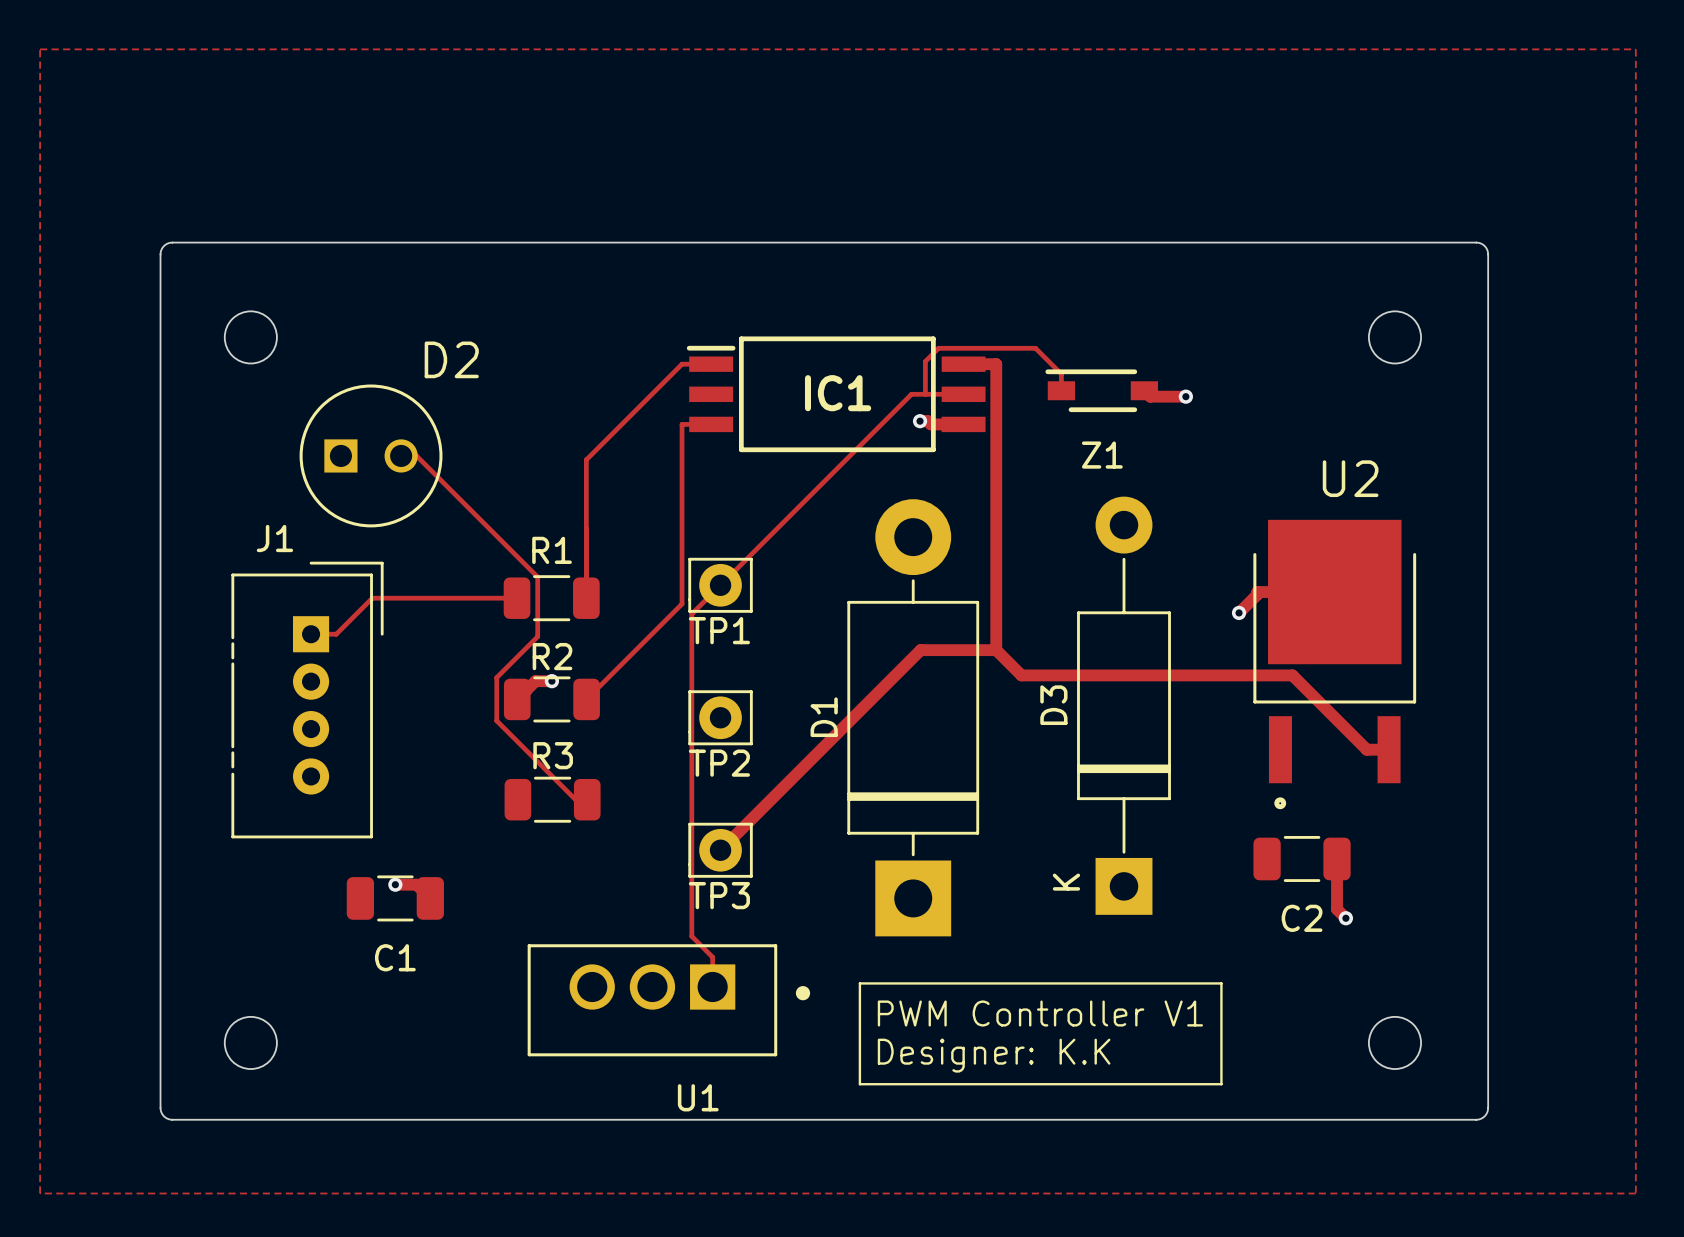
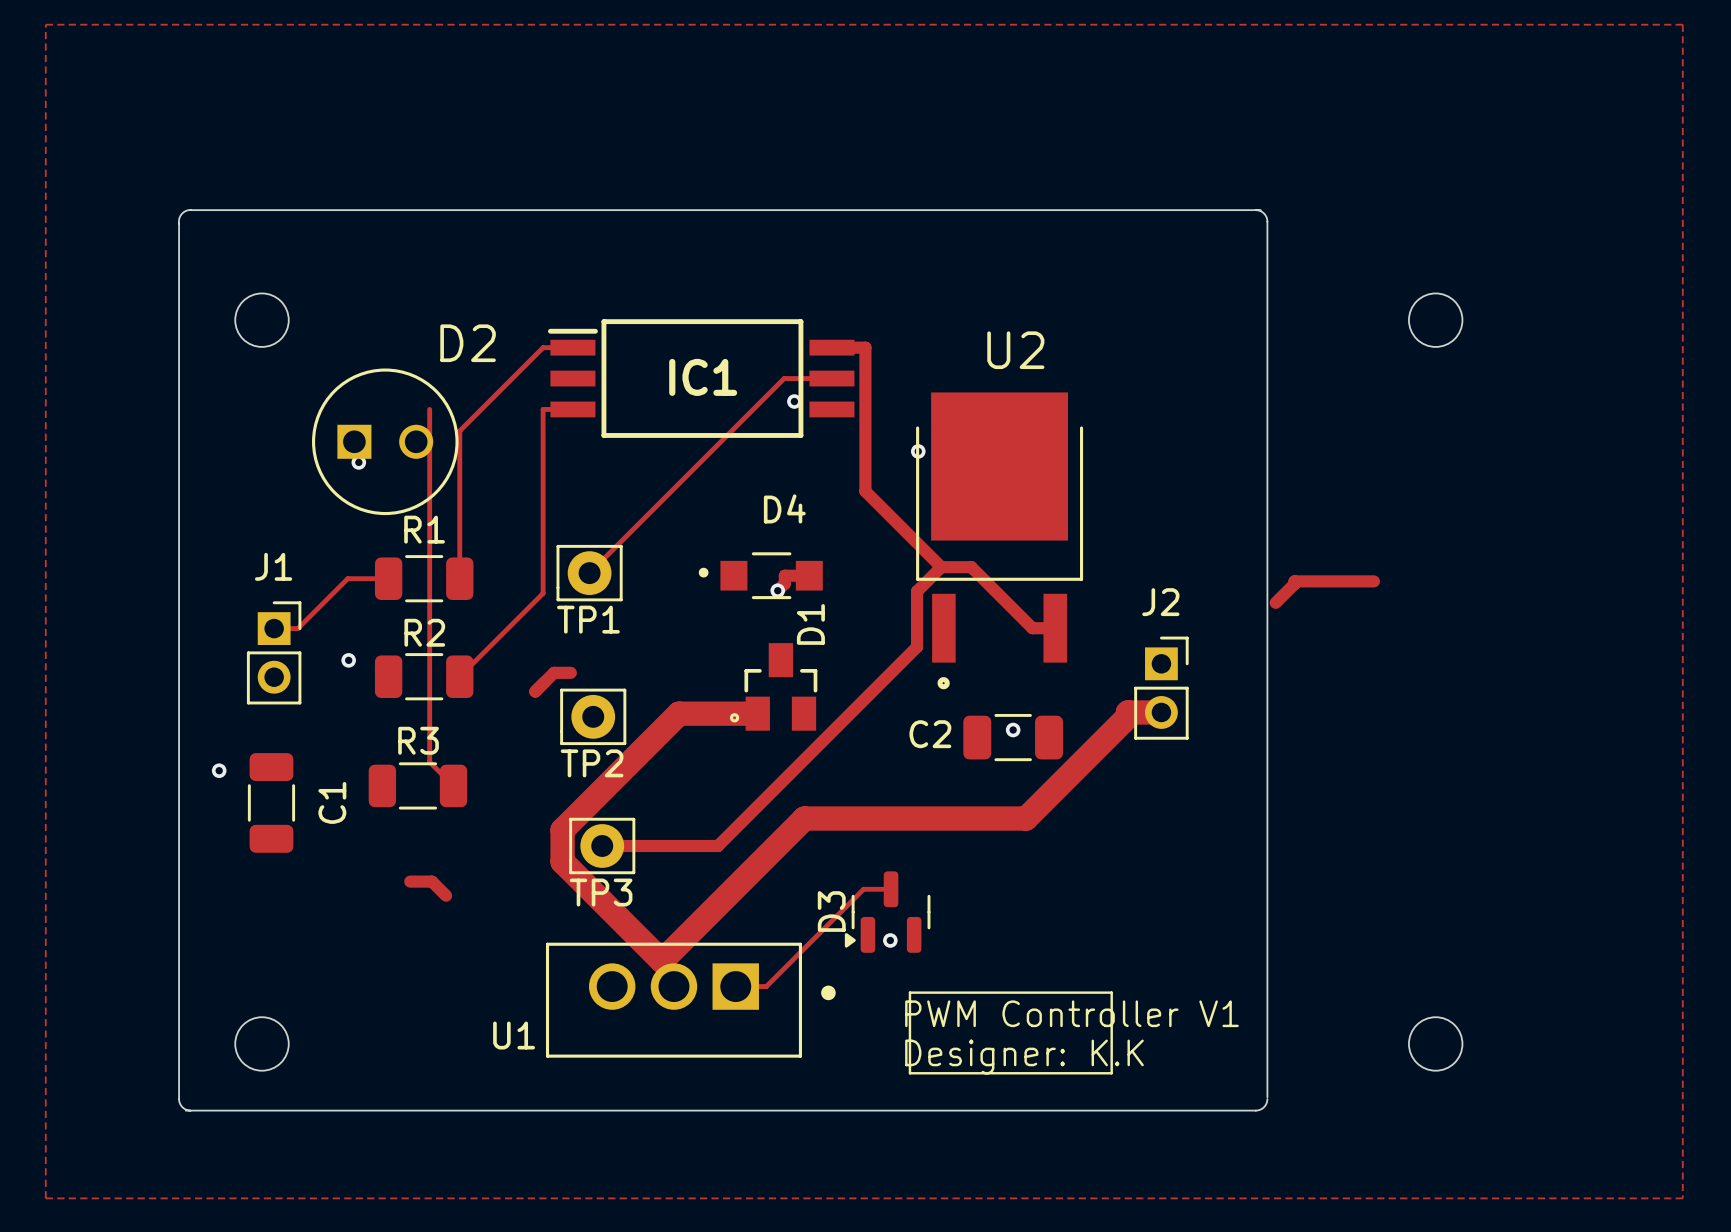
board edge: none -> (1255, 210) (1264, 213) (1267, 221) (1267, 1097)
board edge: none -> (1260, 210) (189, 210) (182, 213) (178, 222) (179, 1099) (182, 1107) (190, 1110)
board edge: (172, 242) (1476, 242) (1482, 244) (1486, 248) (1488, 254) (1488, 1107) (1486, 1113) (1482, 1118) (1476, 1119) (172, 1119) (166, 1118) (162, 1113) (160, 1107) (160, 254) (163, 246) (172, 242) -> none
track: none -> (572, 347) (543, 347) (459, 430) (459, 578)
track: (711, 364) (682, 364) (586, 459) (586, 598) -> none
track: none -> (831, 347) (865, 347) (865, 491) (941, 567)
track: (963, 364) (996, 364) (996, 650) -> none
track: (1061, 390) (1061, 374) (1035, 348) (938, 348) (925, 361) (925, 394) -> none
Z1: (1101, 390) -> none
track: (1144, 390) (1150, 396) (1185, 396) -> none
track: none -> (831, 378) (784, 378) (589, 573)
IC1 position: (836, 394) -> (701, 378)
track: (963, 394) (911, 394) (691, 614) (691, 936) (712, 957) (712, 987) -> (891, 889) (863, 889) (766, 986) (735, 986)
via: (1185, 396) -> none
via: none -> (794, 401)
via position: (920, 421) -> (918, 451)
track: none -> (429, 409) (429, 762) (453, 785)
track: none -> (572, 409) (543, 409) (543, 593) (459, 676)
track: (711, 424) (682, 424) (682, 603) (586, 699) -> none
track: (401, 455) (416, 455) (537, 577) (537, 636) (496, 677) (496, 720) (575, 799) (587, 799) -> none
via: none -> (358, 462)
D3 footprint: [1077, 496, 1171, 915] -> [844, 871, 931, 953]
D1 footprint: [847, 499, 980, 937] -> [729, 643, 818, 731]
J1 name position: J1 (274, 538) -> J1 (273, 566)
J1 footprint: [231, 561, 384, 839] -> [246, 601, 302, 705]
track: none -> (941, 567) (971, 567) (1032, 628) (1055, 628)
track: none -> (941, 567) (917, 591) (917, 646) (718, 845) (602, 845)
TP1 position: (720, 585) -> (589, 573)
D4: none -> (760, 575)
track: none -> (809, 575) (784, 575) (784, 583) (777, 590)
track: none -> (388, 578) (347, 578) (297, 628) (274, 628)
track: (517, 598) (372, 598) (336, 634) (311, 634) -> none
R1 position: (551, 598) -> (424, 578)
via: none -> (777, 590)
via: (1239, 612) -> none
track: (996, 650) (1021, 675) (1292, 675) (1366, 749) (1389, 749) -> none
track: (996, 650) (920, 650) (720, 850) -> none
U2 position: (1334, 664) -> (999, 540)
via: none -> (348, 660)
via: (551, 681) -> none
J2: none -> (1161, 688)
R2 position: (551, 699) -> (424, 676)
TP2 position: (720, 717) -> (593, 716)
D1 name position: D1 (824, 717) -> D1 (810, 624)
track: none -> (1161, 712) (1127, 712) (1127, 716) (1026, 818) (804, 818) (661, 961) (562, 861) (562, 830) (678, 713) (757, 713)
via: none -> (1013, 730)
via: none -> (219, 770)
R3 position: (552, 799) -> (417, 785)
TP3 position: (720, 850) -> (602, 845)
C2 position: (1302, 858) -> (1013, 737)
track: (1337, 858) (1337, 909) (1345, 918) -> none
via: (395, 884) -> none
C1 rotation: 0° (395, 898) -> 90° clockwise (271, 802)
C1 position: (395, 898) -> (271, 802)
C2 name position: C2 (1302, 918) -> C2 (930, 734)
via: (1345, 918) -> none
via: none -> (890, 940)
C1 name position: C1 (395, 957) -> C1 (332, 802)
line: (859, 983) (1221, 983) (1221, 1084) (859, 1084) (859, 983) -> none
line: none -> (909, 992) (1111, 992) (1111, 1073) (909, 1073) (909, 992)
board edge: none -> (1267, 1099) (1264, 1107) (1255, 1110) (185, 1110)
U1 name position: U1 (698, 1097) -> U1 (514, 1035)

